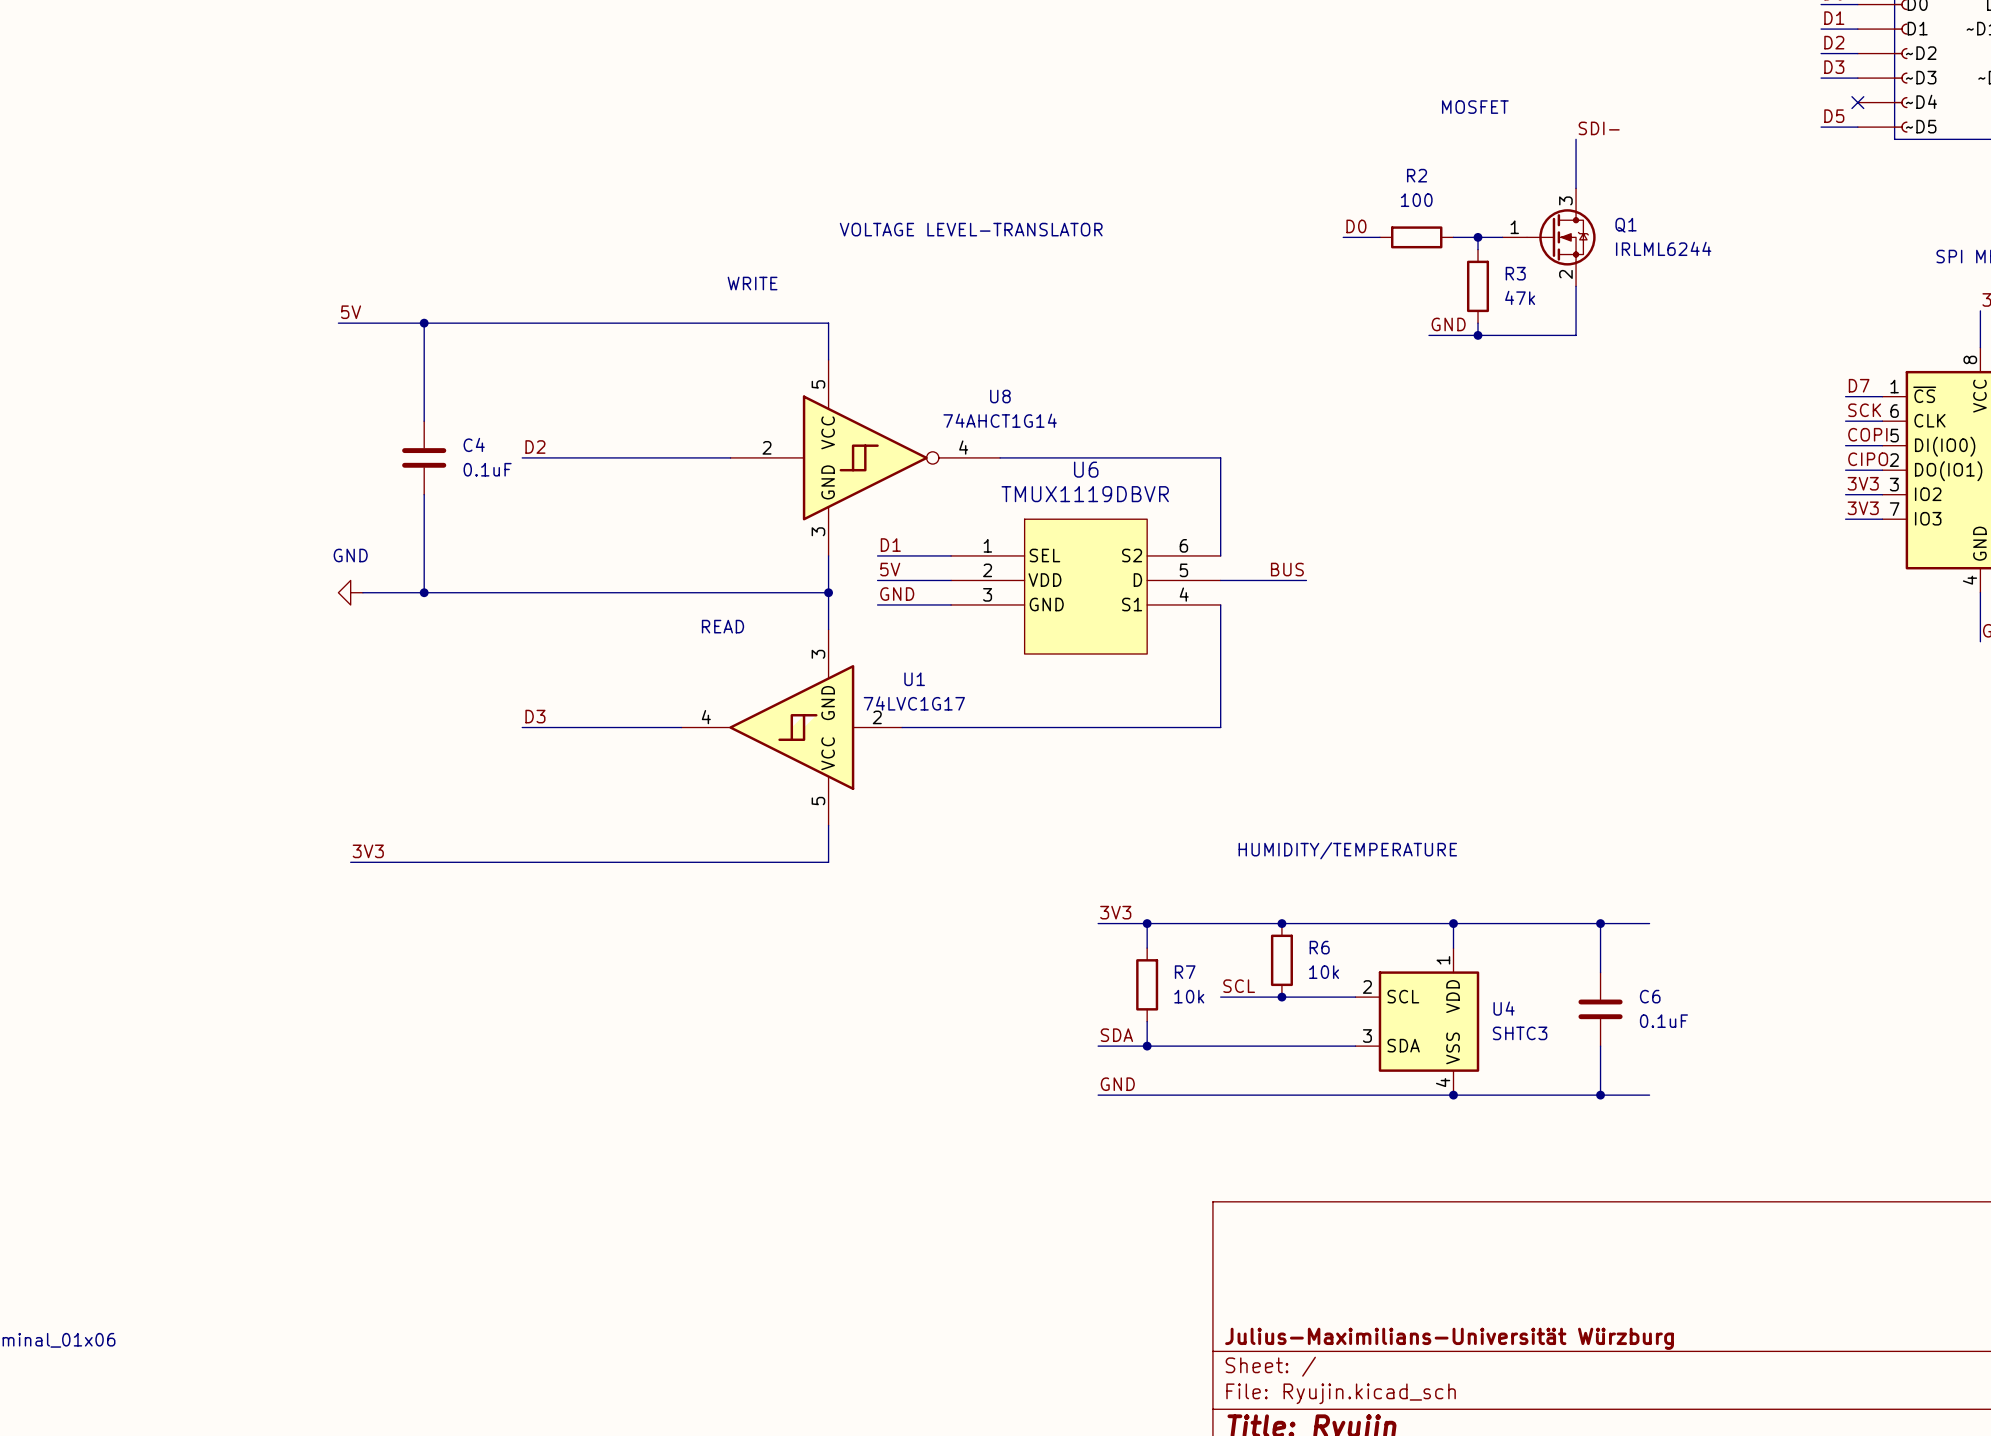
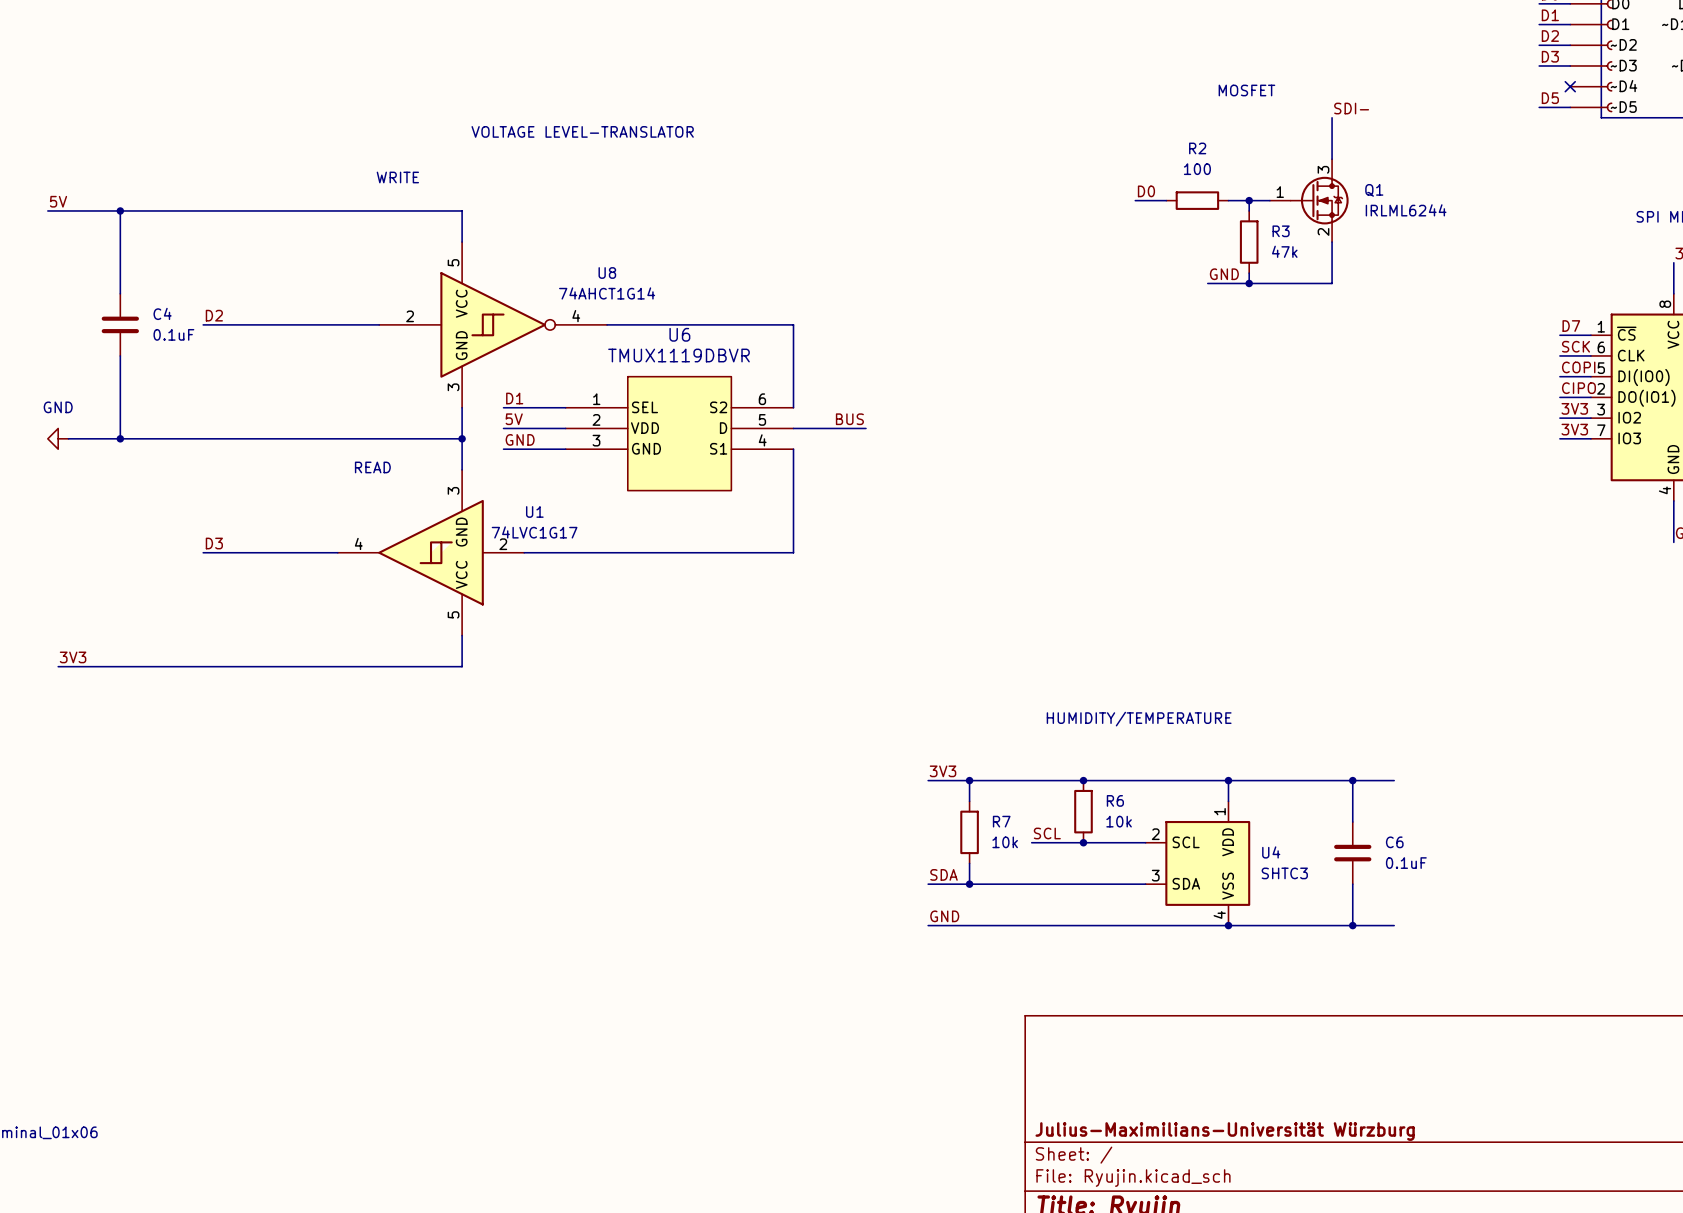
text: none -> VOLTAGE LEVEL-TRANSLATOR (582, 131)
text: none -> WRITE (397, 177)
text: VOLTAGE LEVEL-TRANSLATOR (971, 229) -> none
label: none -> 5V (58, 201)
wire: none -> (47, 210) (462, 210) (462, 242)
wire: none -> (120, 210) (120, 293)
junction: none -> (120, 210)
text: WRITE (752, 283) -> none
label: 5V (351, 312) -> none
wire: (338, 323) (828, 323) (828, 359) -> none
wire: (424, 323) (424, 421) -> none
junction: (424, 323) -> none
label: none -> D2 (214, 315)
wire: none -> (203, 324) (379, 324)
wire: none -> (607, 324) (793, 324) (793, 407)
wire: none -> (120, 355) (120, 438)
label: D2 (535, 447) -> none
C4 position: (424, 457) -> (120, 324)
wire: (522, 457) (730, 457) -> none
U8 position: (865, 457) -> (493, 324)
wire: (1000, 457) (1220, 457) (1220, 555) -> none
label: none -> D1 (514, 398)
wire: none -> (462, 407) (462, 469)
wire: none -> (503, 407) (565, 407)
wire: (424, 494) (424, 592) -> none
label: none -> 5V (514, 419)
label: none -> BUS (849, 419)
wire: none -> (503, 428) (565, 428)
wire: none -> (793, 428) (866, 428)
power symbol: none -> GND (58, 438)
wire: none -> (68, 438) (462, 438)
junction: none -> (120, 438)
junction: none -> (462, 438)
label: none -> GND (520, 439)
wire: none -> (503, 449) (565, 449)
wire: none -> (793, 449) (793, 552) (524, 552)
label: D1 (890, 545) -> none
text: none -> READ (372, 467)
wire: (828, 555) (828, 629) -> none
wire: (877, 555) (951, 555) -> none
label: 5V (890, 569) -> none
label: BUS (1287, 569) -> none
wire: (877, 580) (951, 580) -> none
wire: (1220, 580) (1306, 580) -> none
U6 position: (1085, 586) -> (679, 433)
power symbol: GND (350, 592) -> none
wire: (362, 592) (828, 592) -> none
junction: (424, 592) -> none
junction: (828, 592) -> none
label: GND (897, 594) -> none
wire: (877, 604) (951, 604) -> none
wire: (1220, 604) (1220, 727) (902, 727) -> none
text: READ (722, 626) -> none
label: none -> D3 (214, 543)
wire: none -> (203, 552) (337, 552)
label: D3 (535, 716) -> none
wire: (522, 727) (681, 727) -> none
U1 position: (791, 727) -> (431, 552)
wire: none -> (462, 635) (462, 666) (58, 666)
label: none -> 3V3 (73, 657)
wire: (828, 825) (828, 862) (350, 862) -> none
label: 3V3 (368, 851) -> none

